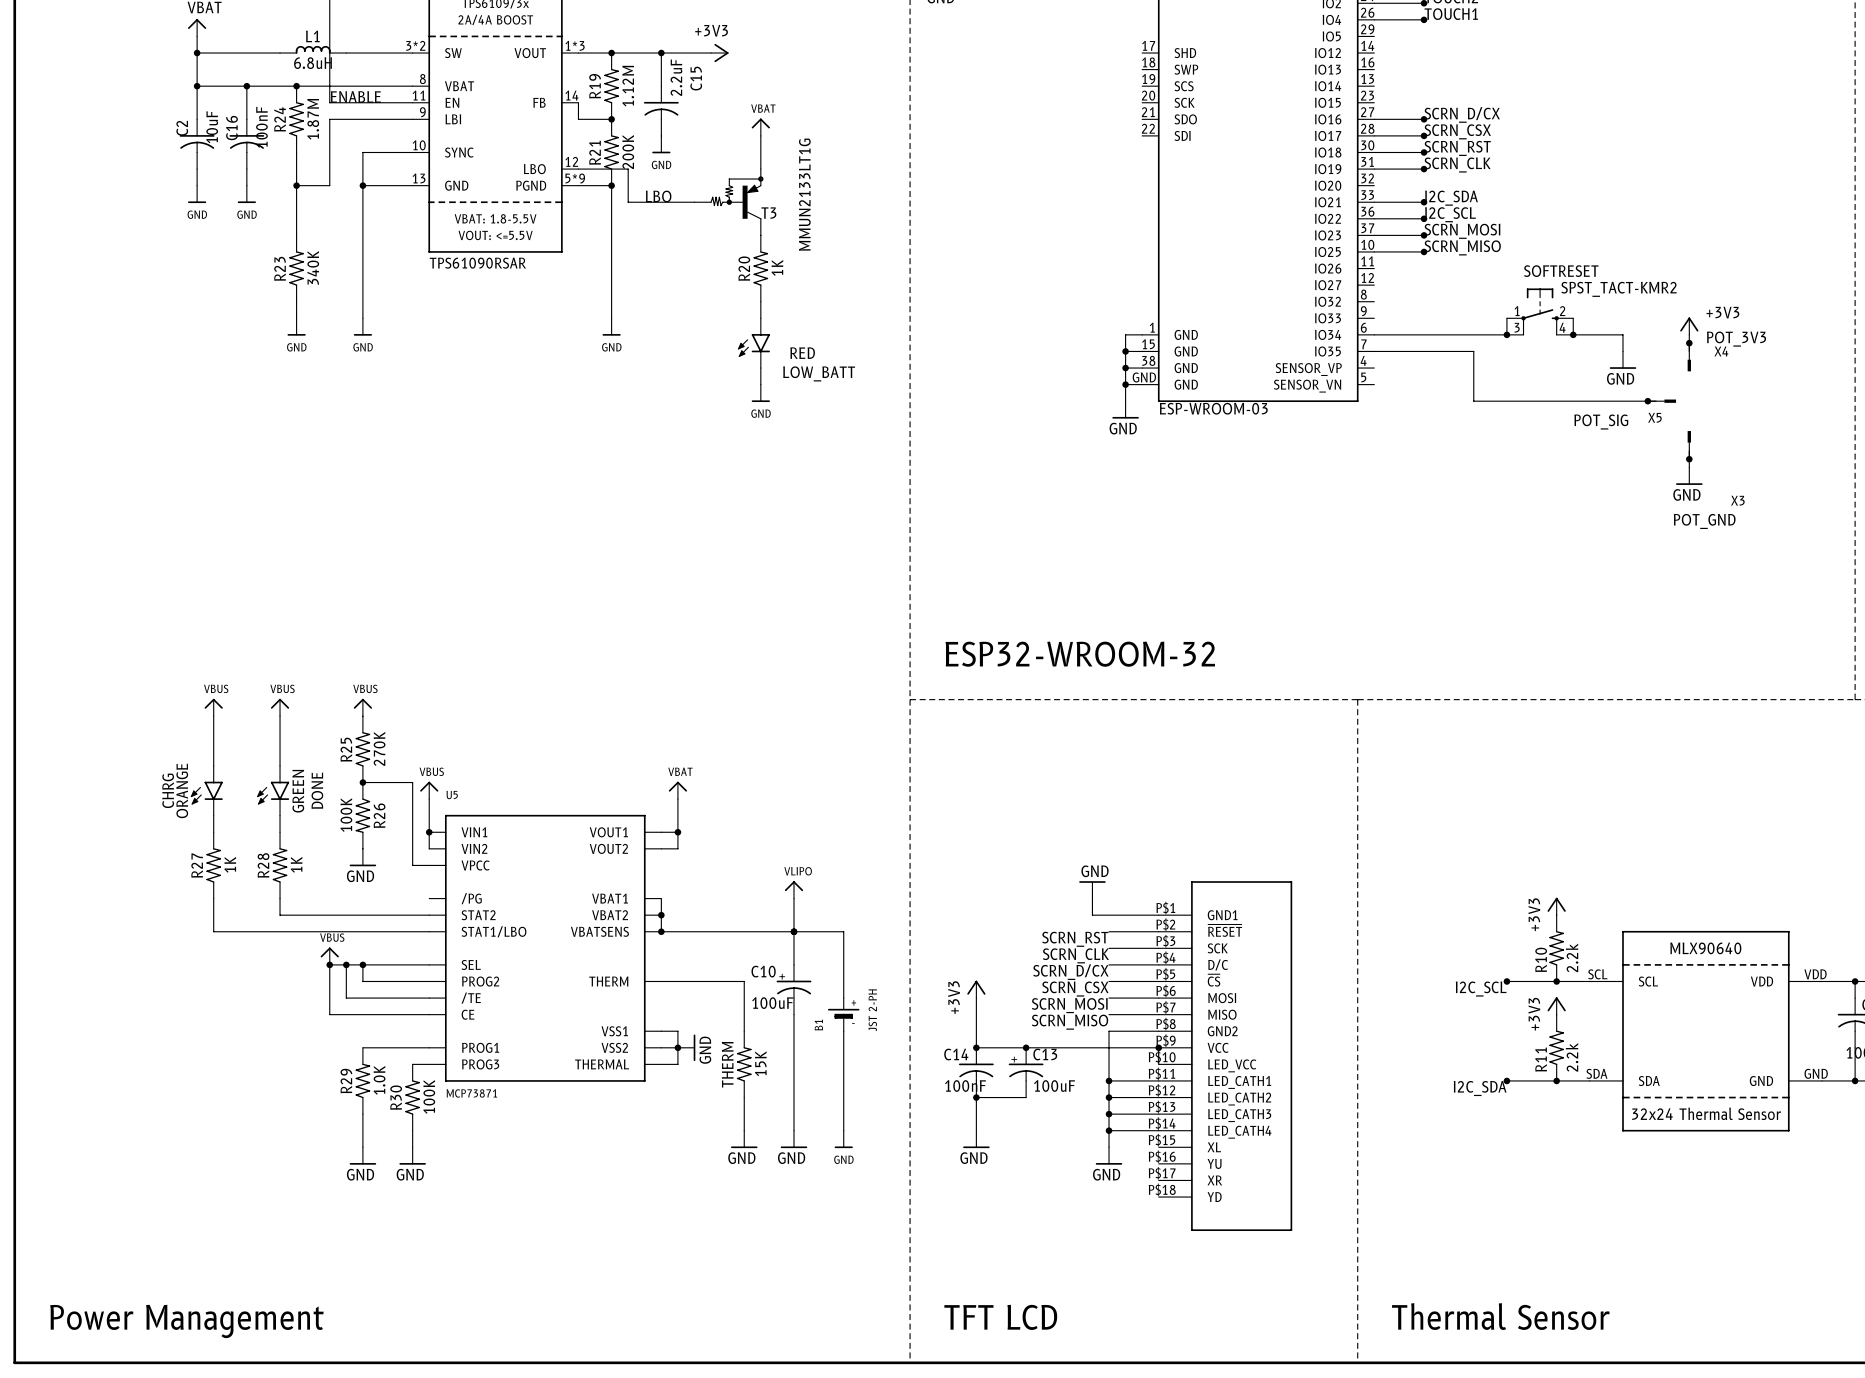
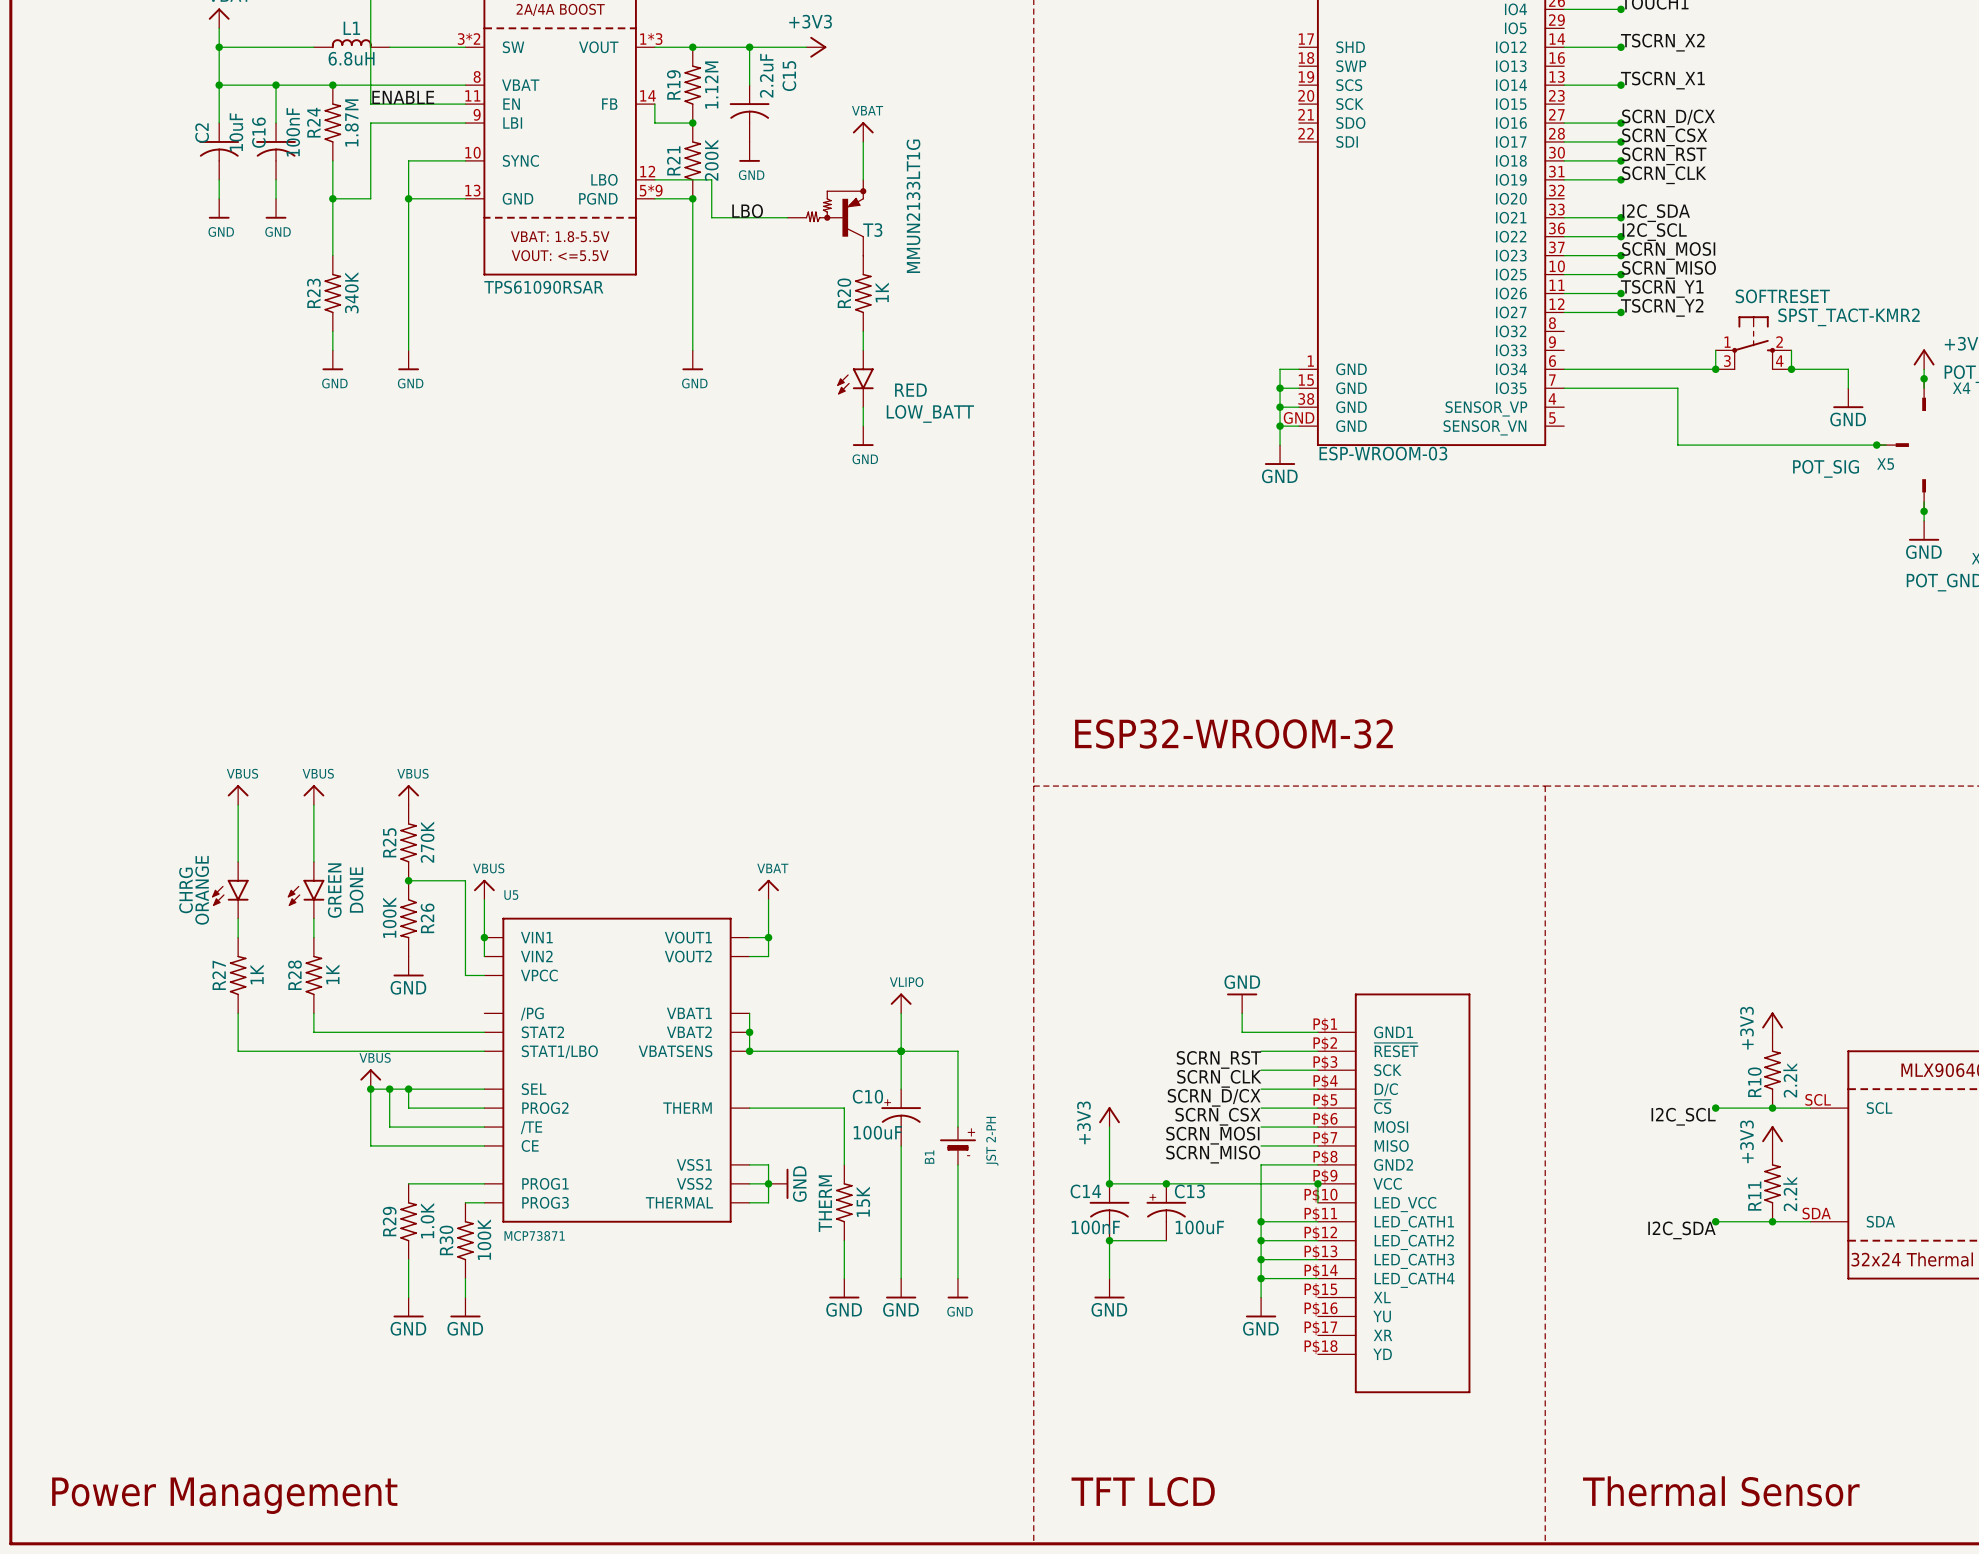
label: none -> TSCRN_X2 (1662, 42)
wire: none -> (1564, 47) (1621, 47)
junction: none -> (1621, 47)
label: none -> TSCRN_X1 (1662, 80)
wire: none -> (1564, 85) (1621, 85)
junction: none -> (1621, 85)
label: none -> TSCRN_Y1 (1662, 288)
wire: none -> (1564, 293) (1621, 293)
junction: none -> (1621, 293)
label: none -> TSCRN_Y2 (1662, 307)
wire: none -> (1564, 312) (1621, 312)
junction: none -> (1621, 312)

